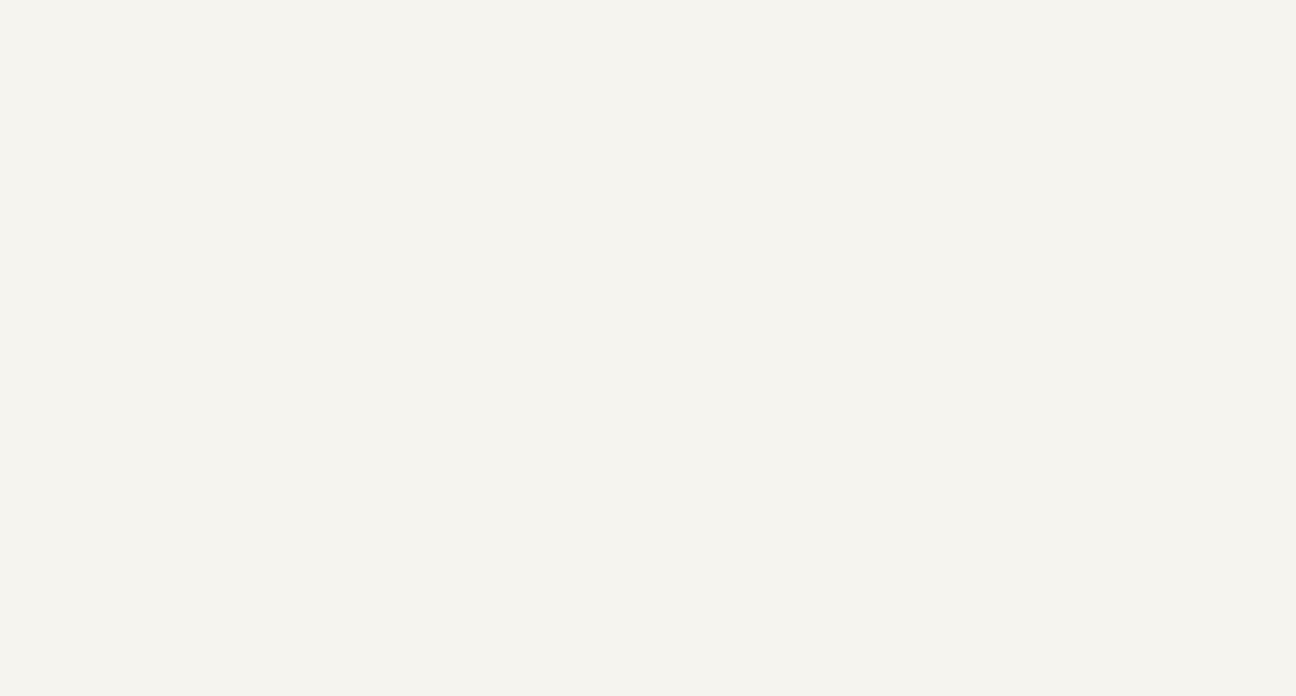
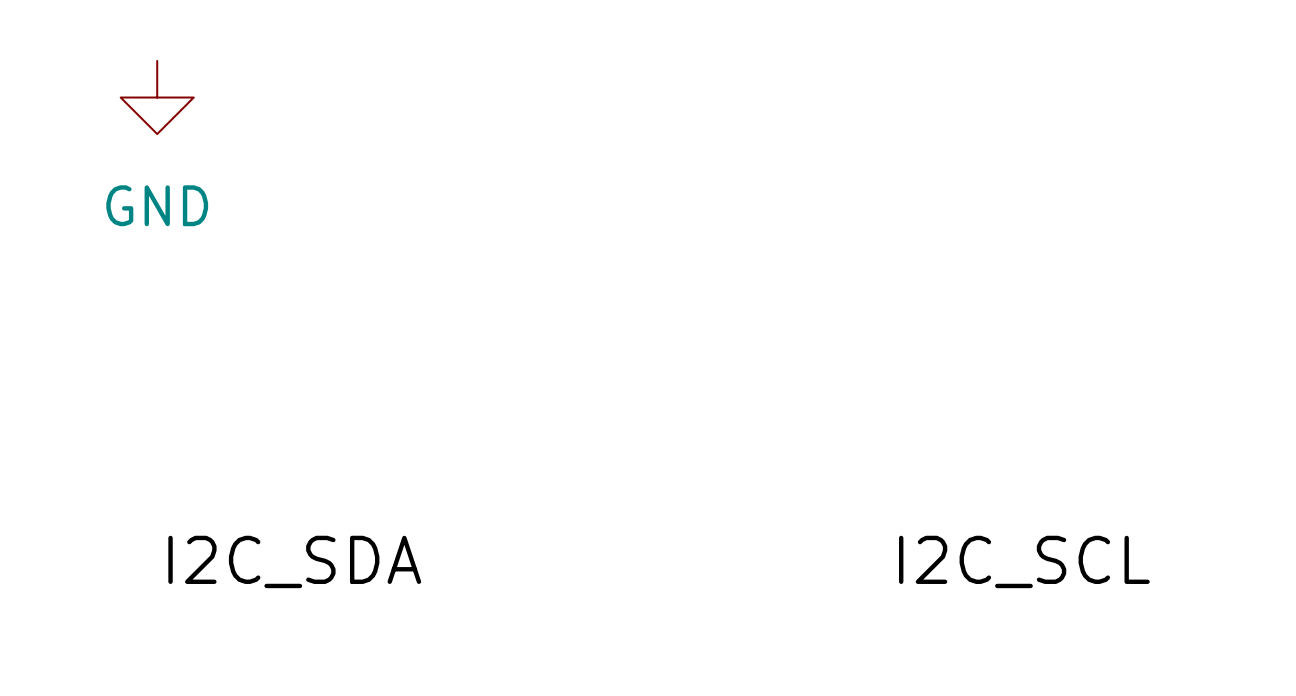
power symbol: none -> GND (157, 97)
label: none -> I2C_SDA (294, 561)
label: none -> I2C_SCL (1024, 561)

